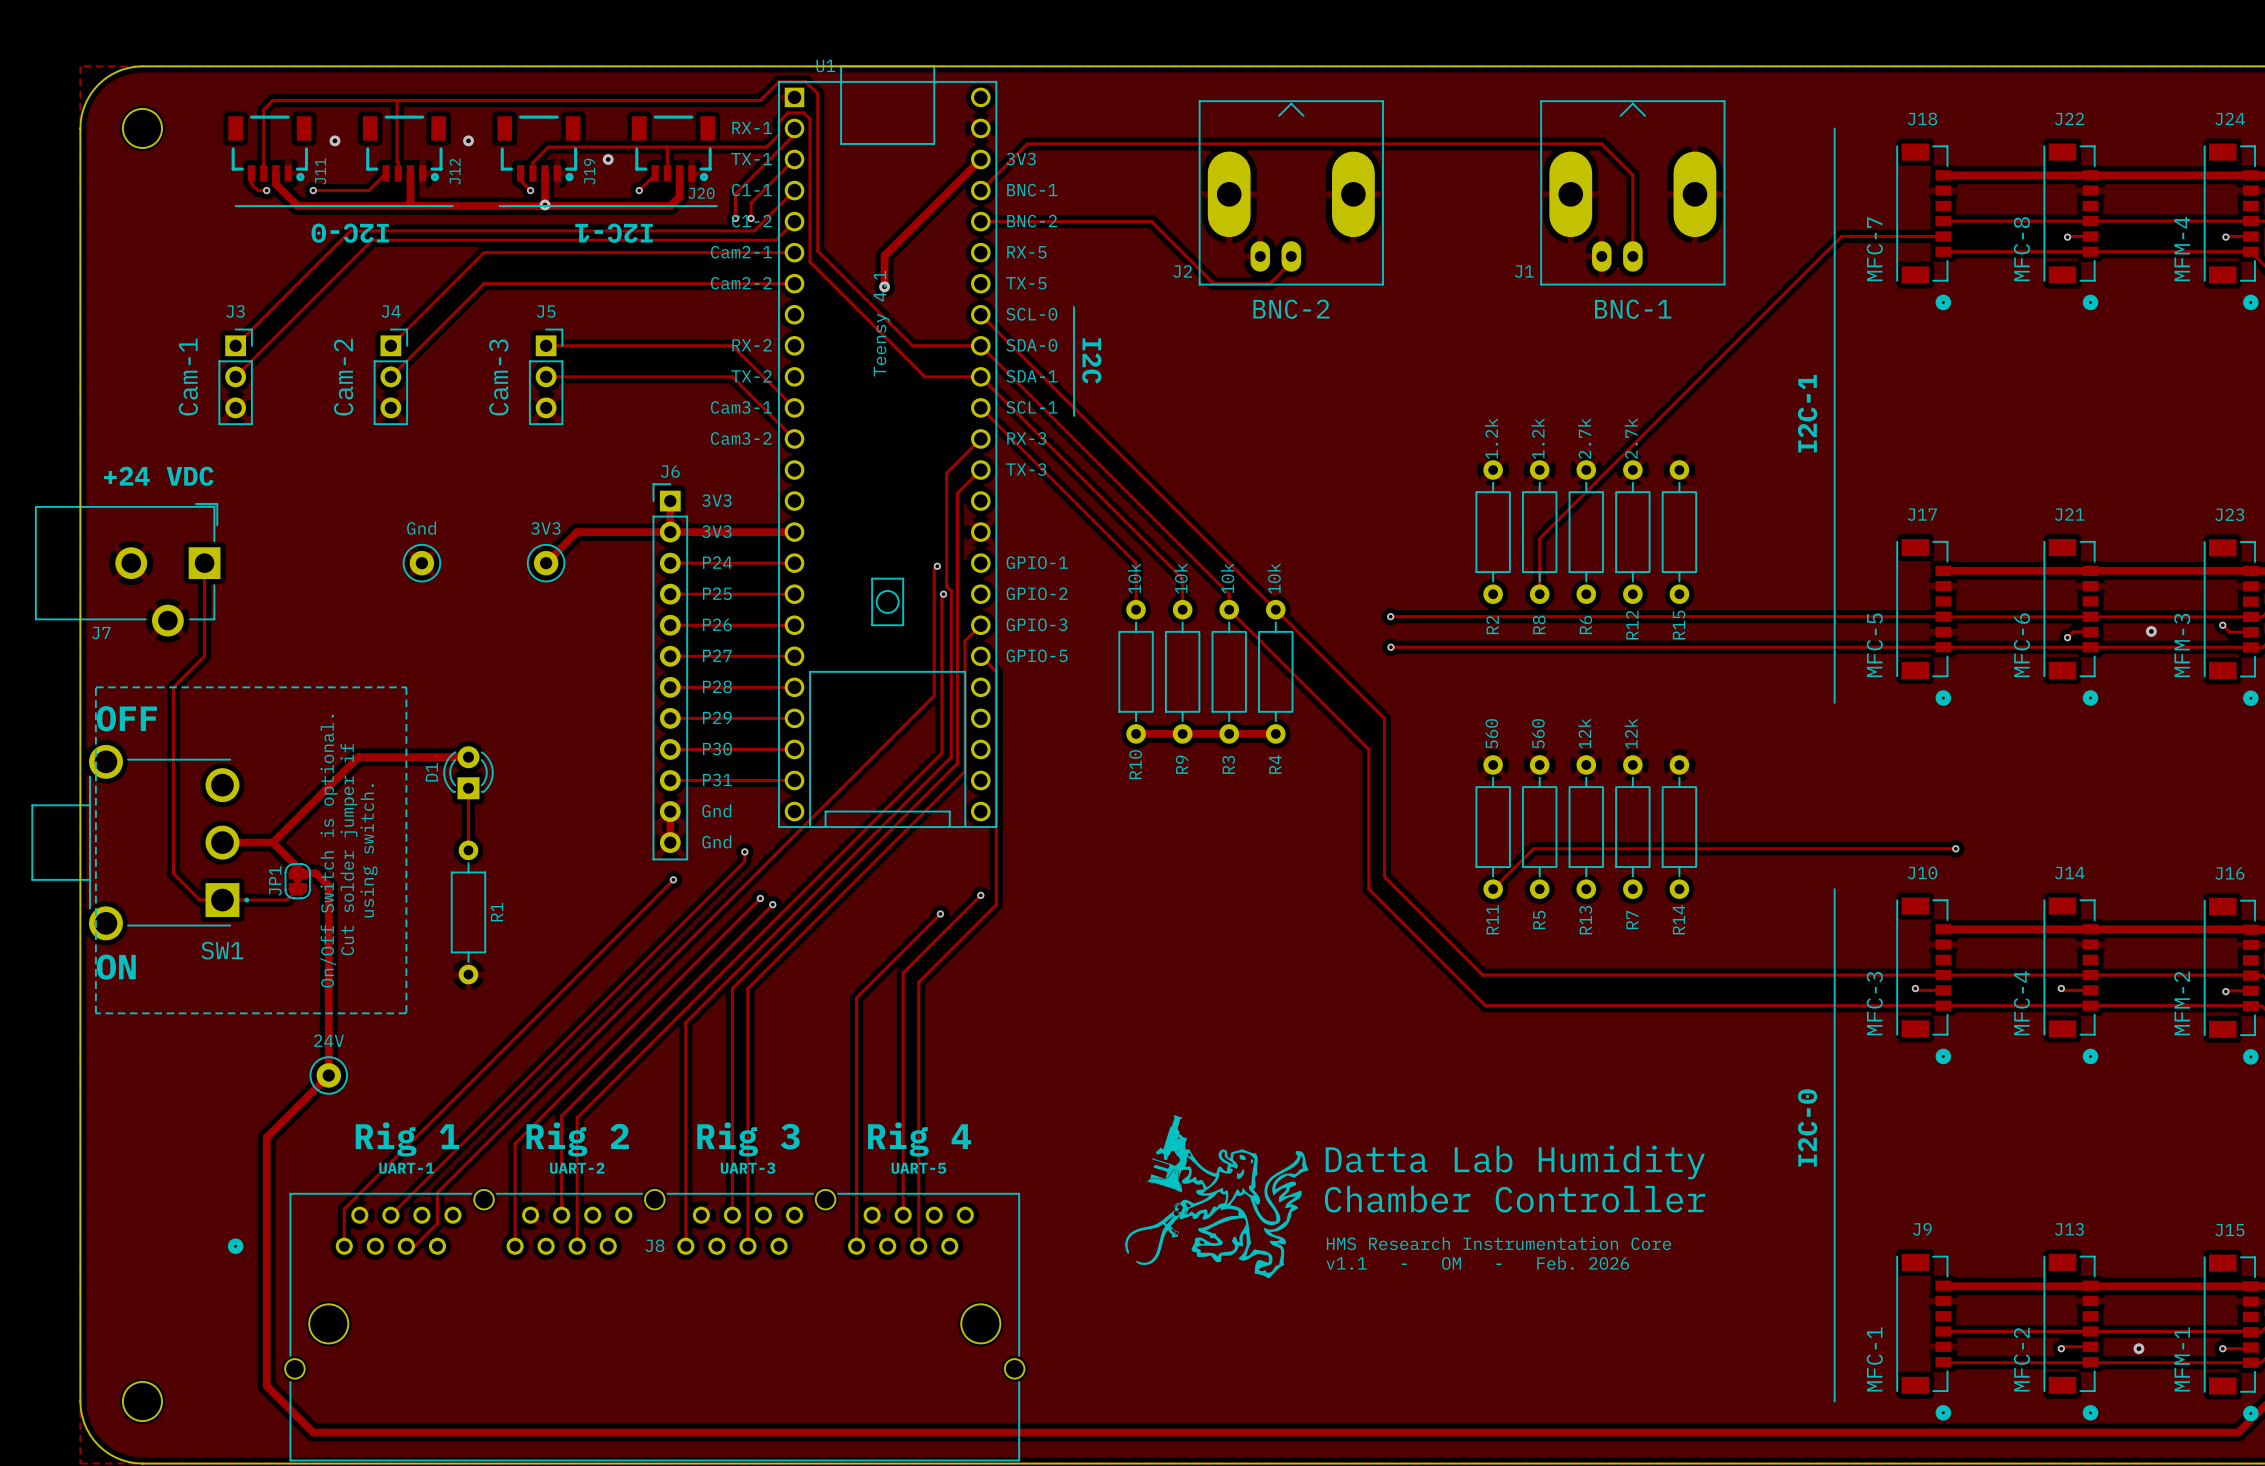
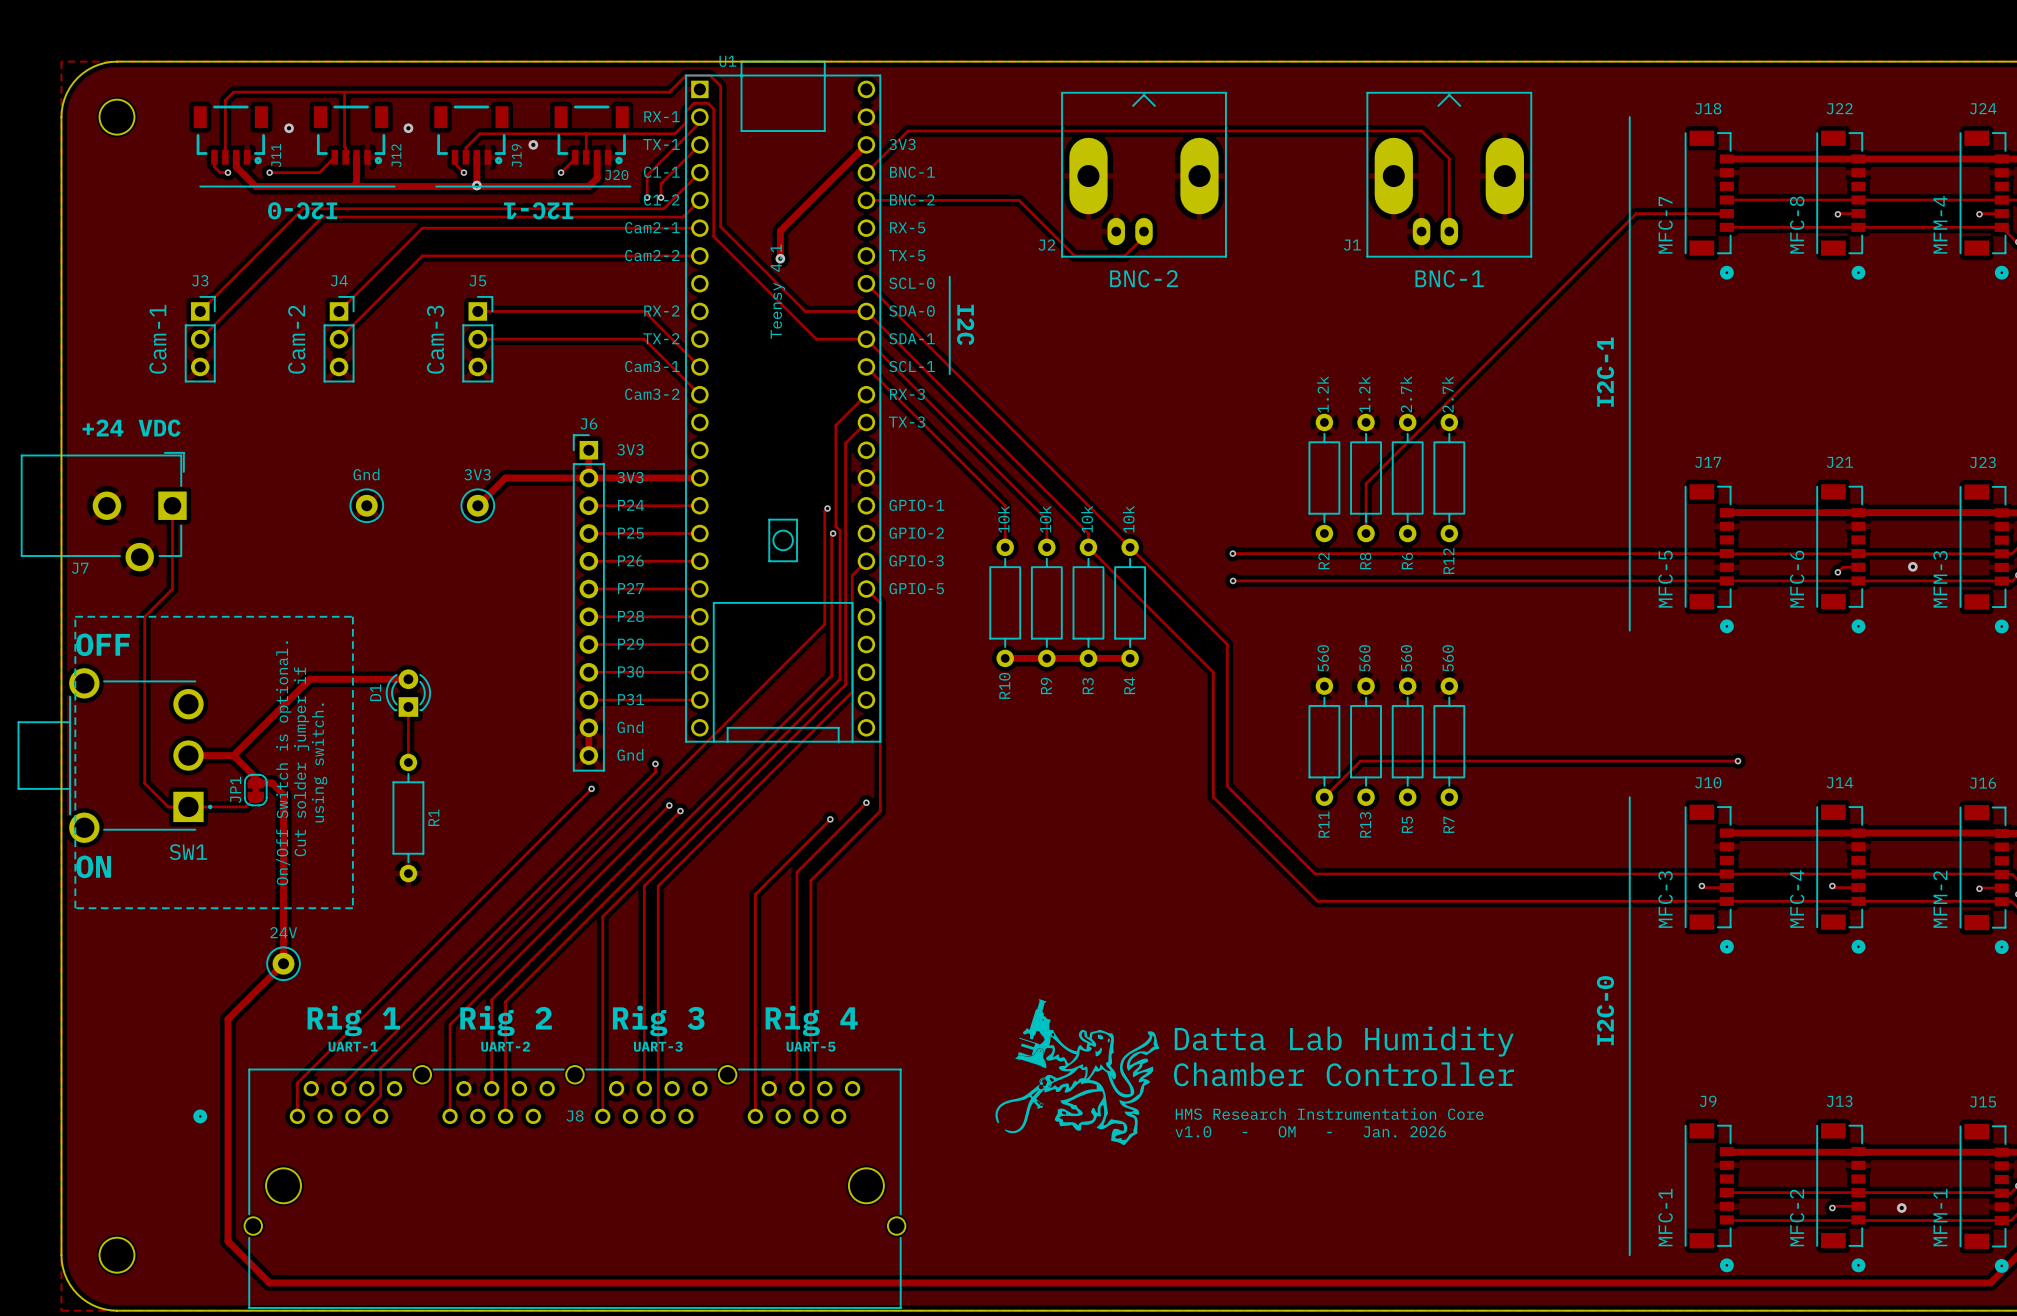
R15: (1679, 532) -> none
track: (2222, 625) (2229, 632) (2250, 632) -> none
via: (2222, 625) -> none
R13 value: 12k (1584, 733) -> 560 (1406, 658)
R7 value: 12k (1631, 733) -> 560 (1448, 658)
R14: (1679, 827) -> none
R5 name: R5 (1539, 920) -> R13 (1365, 824)
R13 name: R13 (1585, 920) -> R5 (1407, 824)
text: v1.1 - OM - Feb. 2026 (1477, 1263) -> v1.0 - OM - Jan. 2026 (1310, 1131)
track: (2250, 1347) (2222, 1348) -> none
via: (2222, 1348) -> none

